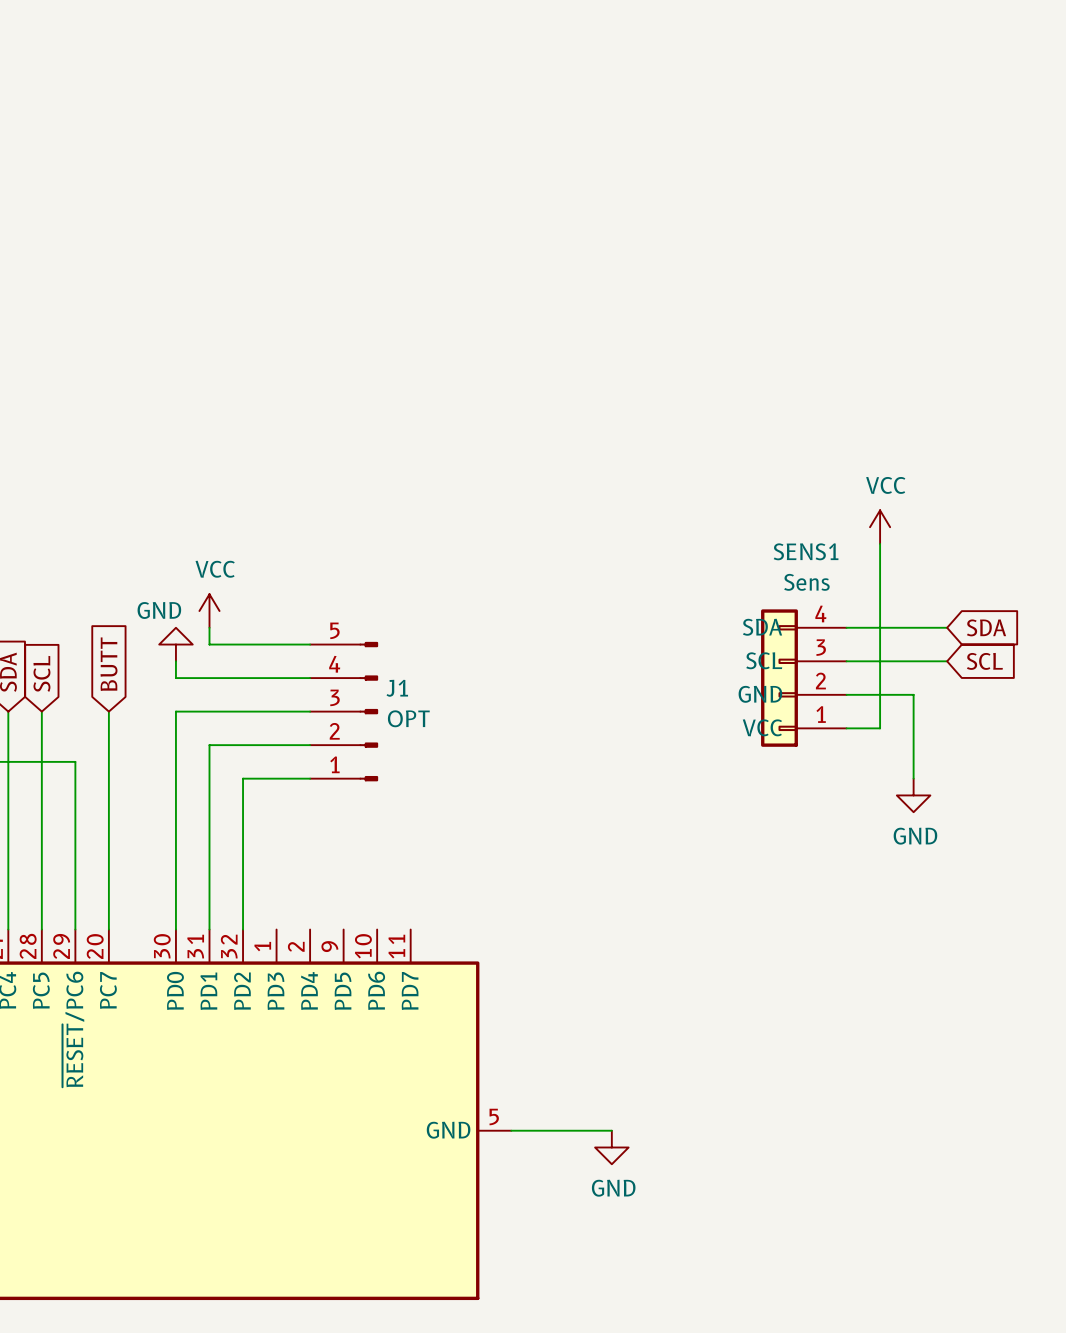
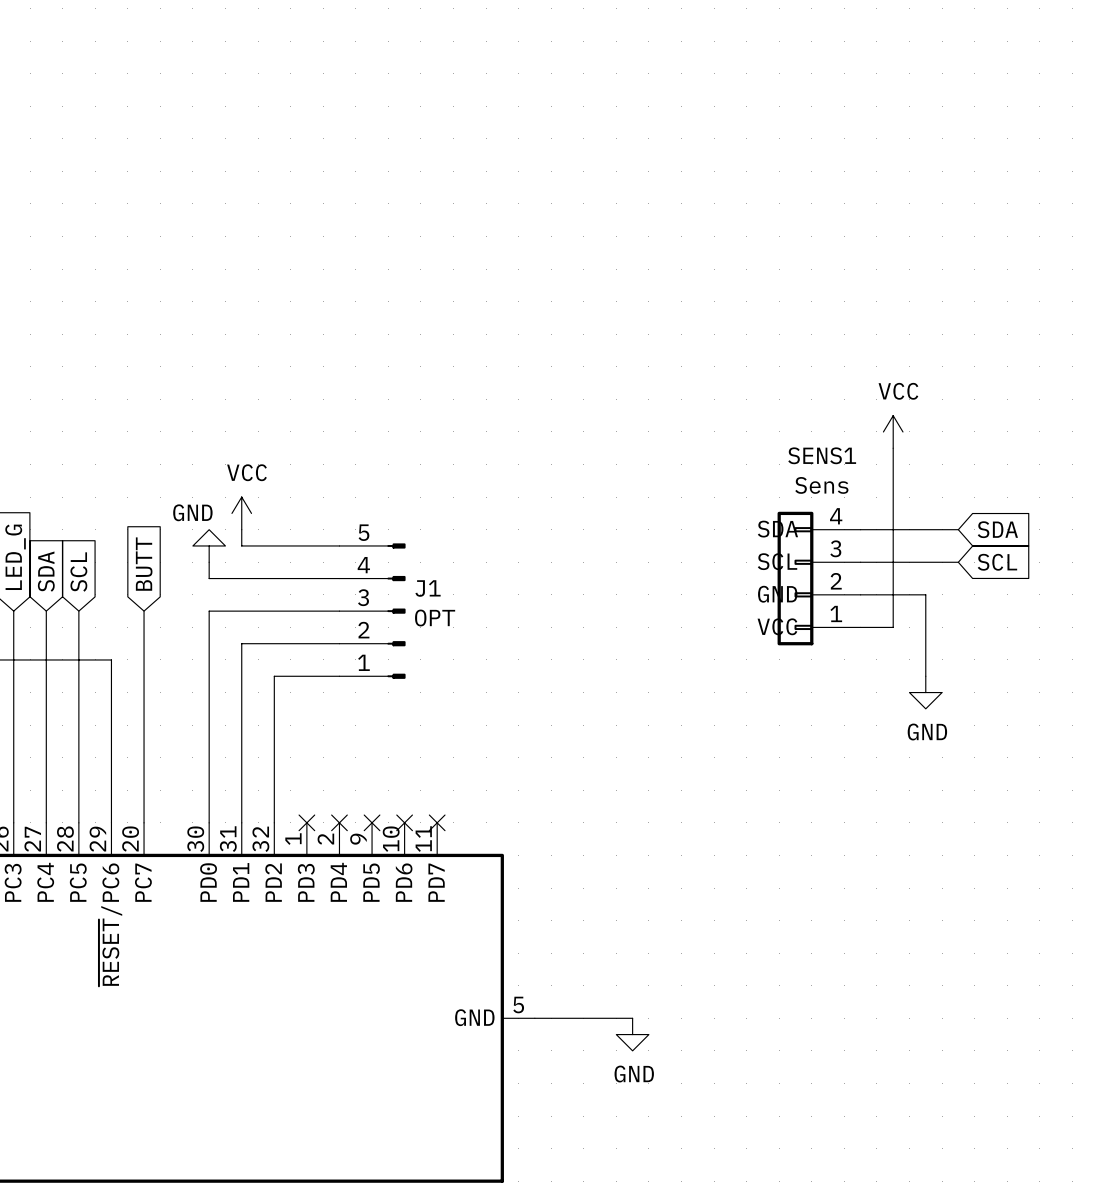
no-connect mark: none -> (306, 822)
no-connect mark: none -> (339, 822)
no-connect mark: none -> (372, 822)
no-connect mark: none -> (404, 822)
no-connect mark: none -> (437, 822)

